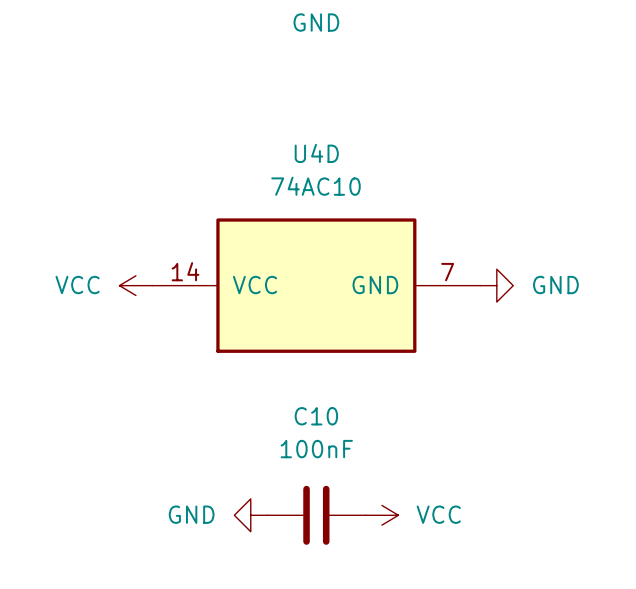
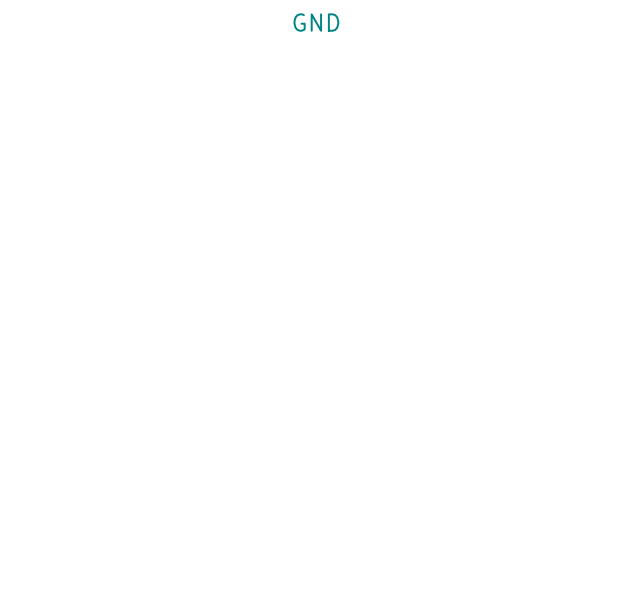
power symbol: VCC (135, 285) -> none
U4D: 74AC10 (316, 285) -> none
power symbol: GND (496, 285) -> none
power symbol: GND (250, 515) -> none
C10: 100nF (316, 515) -> none
power symbol: VCC (381, 515) -> none

